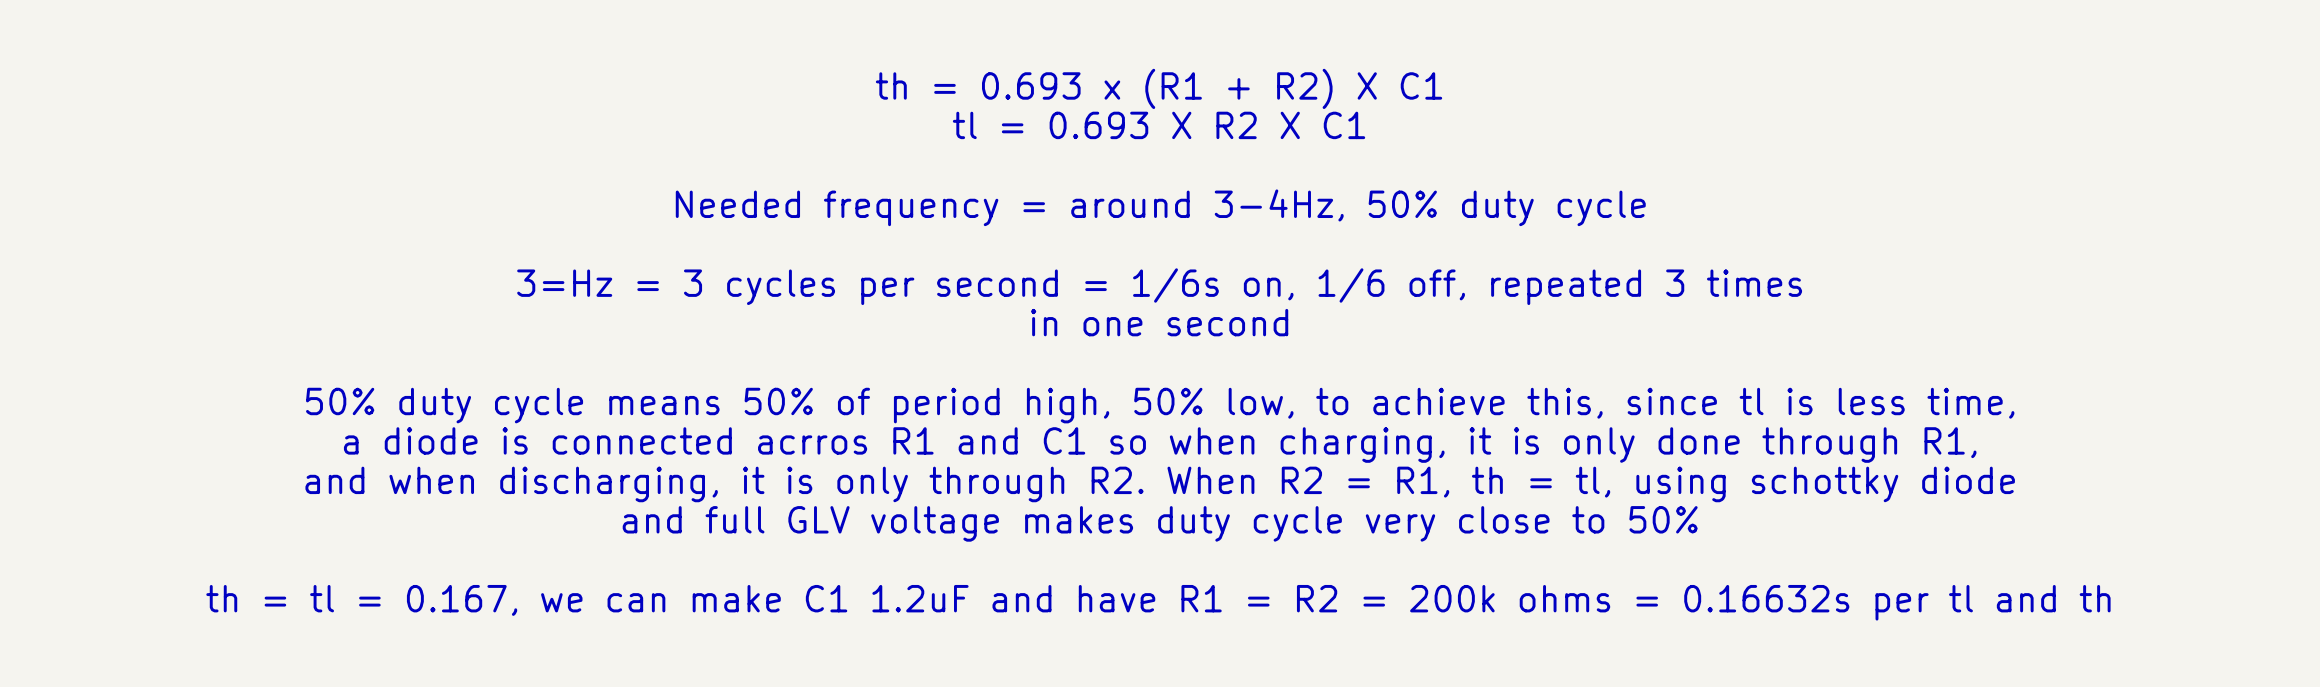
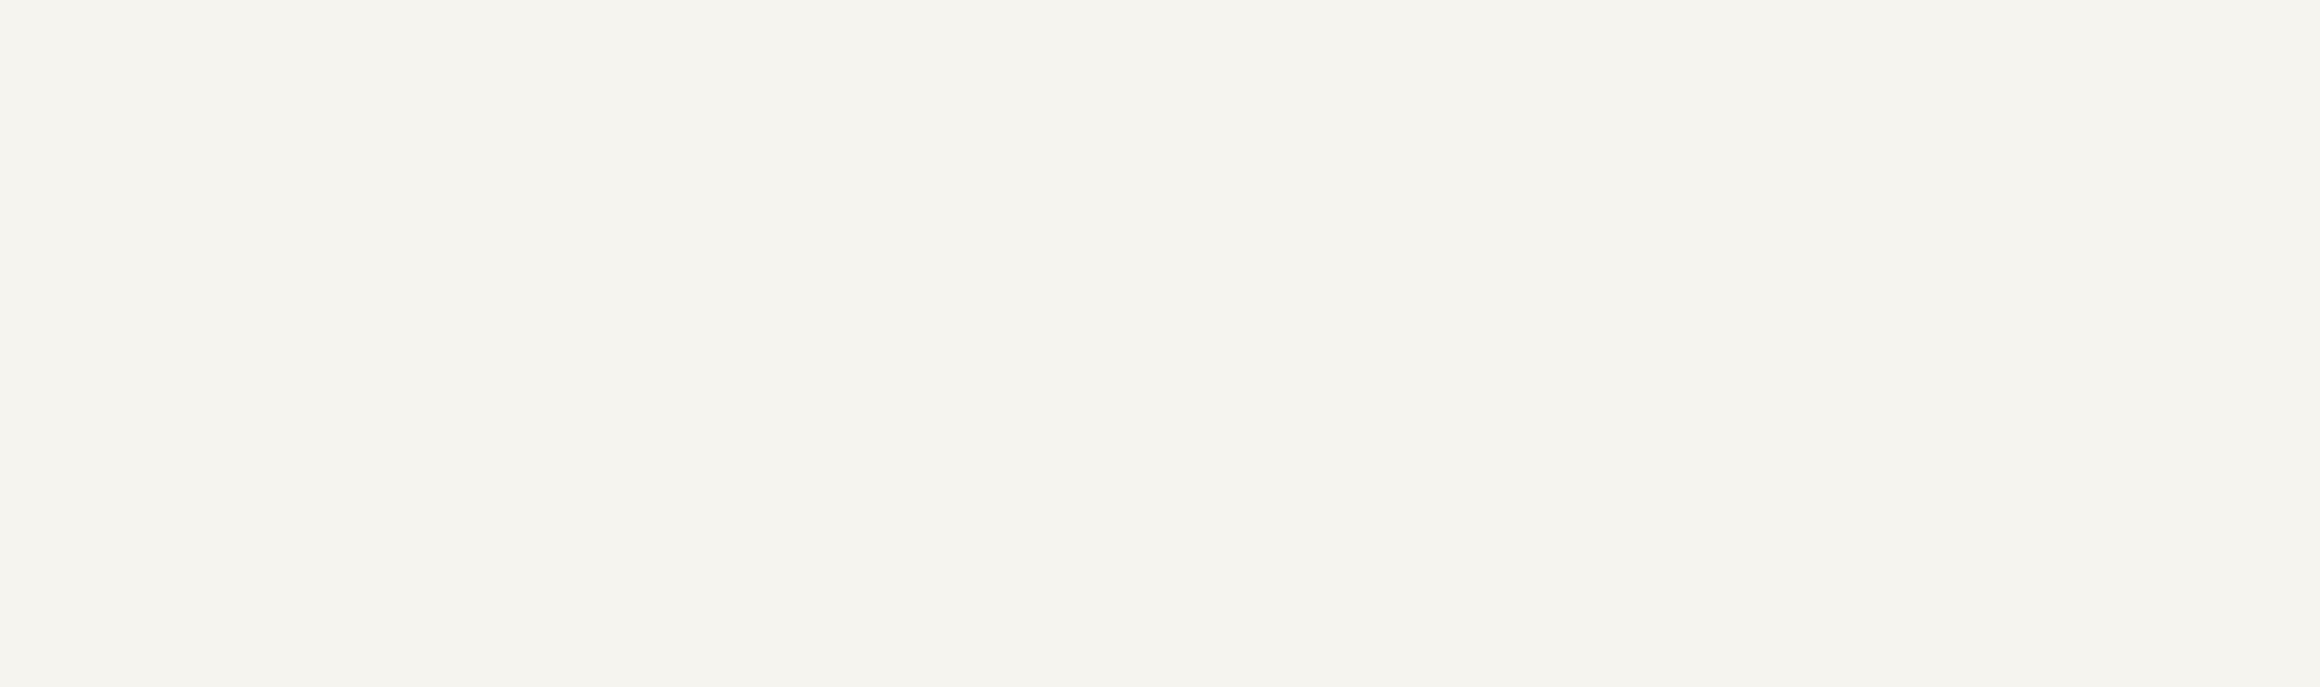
text: th = 0.693 x (R1 + R2) X C1 (1159, 88) -> none
text: tl = 0.693 X R2 X C1 (1159, 125) -> none
text: Needed frequency = around 3-4Hz, 50% duty cycle (1160, 207) -> none
text: 3=Hz = 3 cycles per second = 1/6s on, 1/6 off, repeated 3 times (1159, 286) -> none
text: in one second (1159, 322) -> none
text: 50% duty cycle means 50% of period high, 50% low, to achieve this, since tl is less time, (1160, 405) -> none
text: a diode is connected acrros R1 and C1 so when charging, it is only done through R1, (1160, 445) -> none
text: and when discharging, it is only through R2. When R2 = R1, th = tl, using schottky diode (1160, 484) -> none
text: and full GLV voltage makes duty cycle very close to 50% (1160, 523) -> none
text: th = tl = 0.167, we can make C1 1.2uF and have R1 = R2 = 200k ohms = 0.16632s per tl and th (1158, 602) -> none

